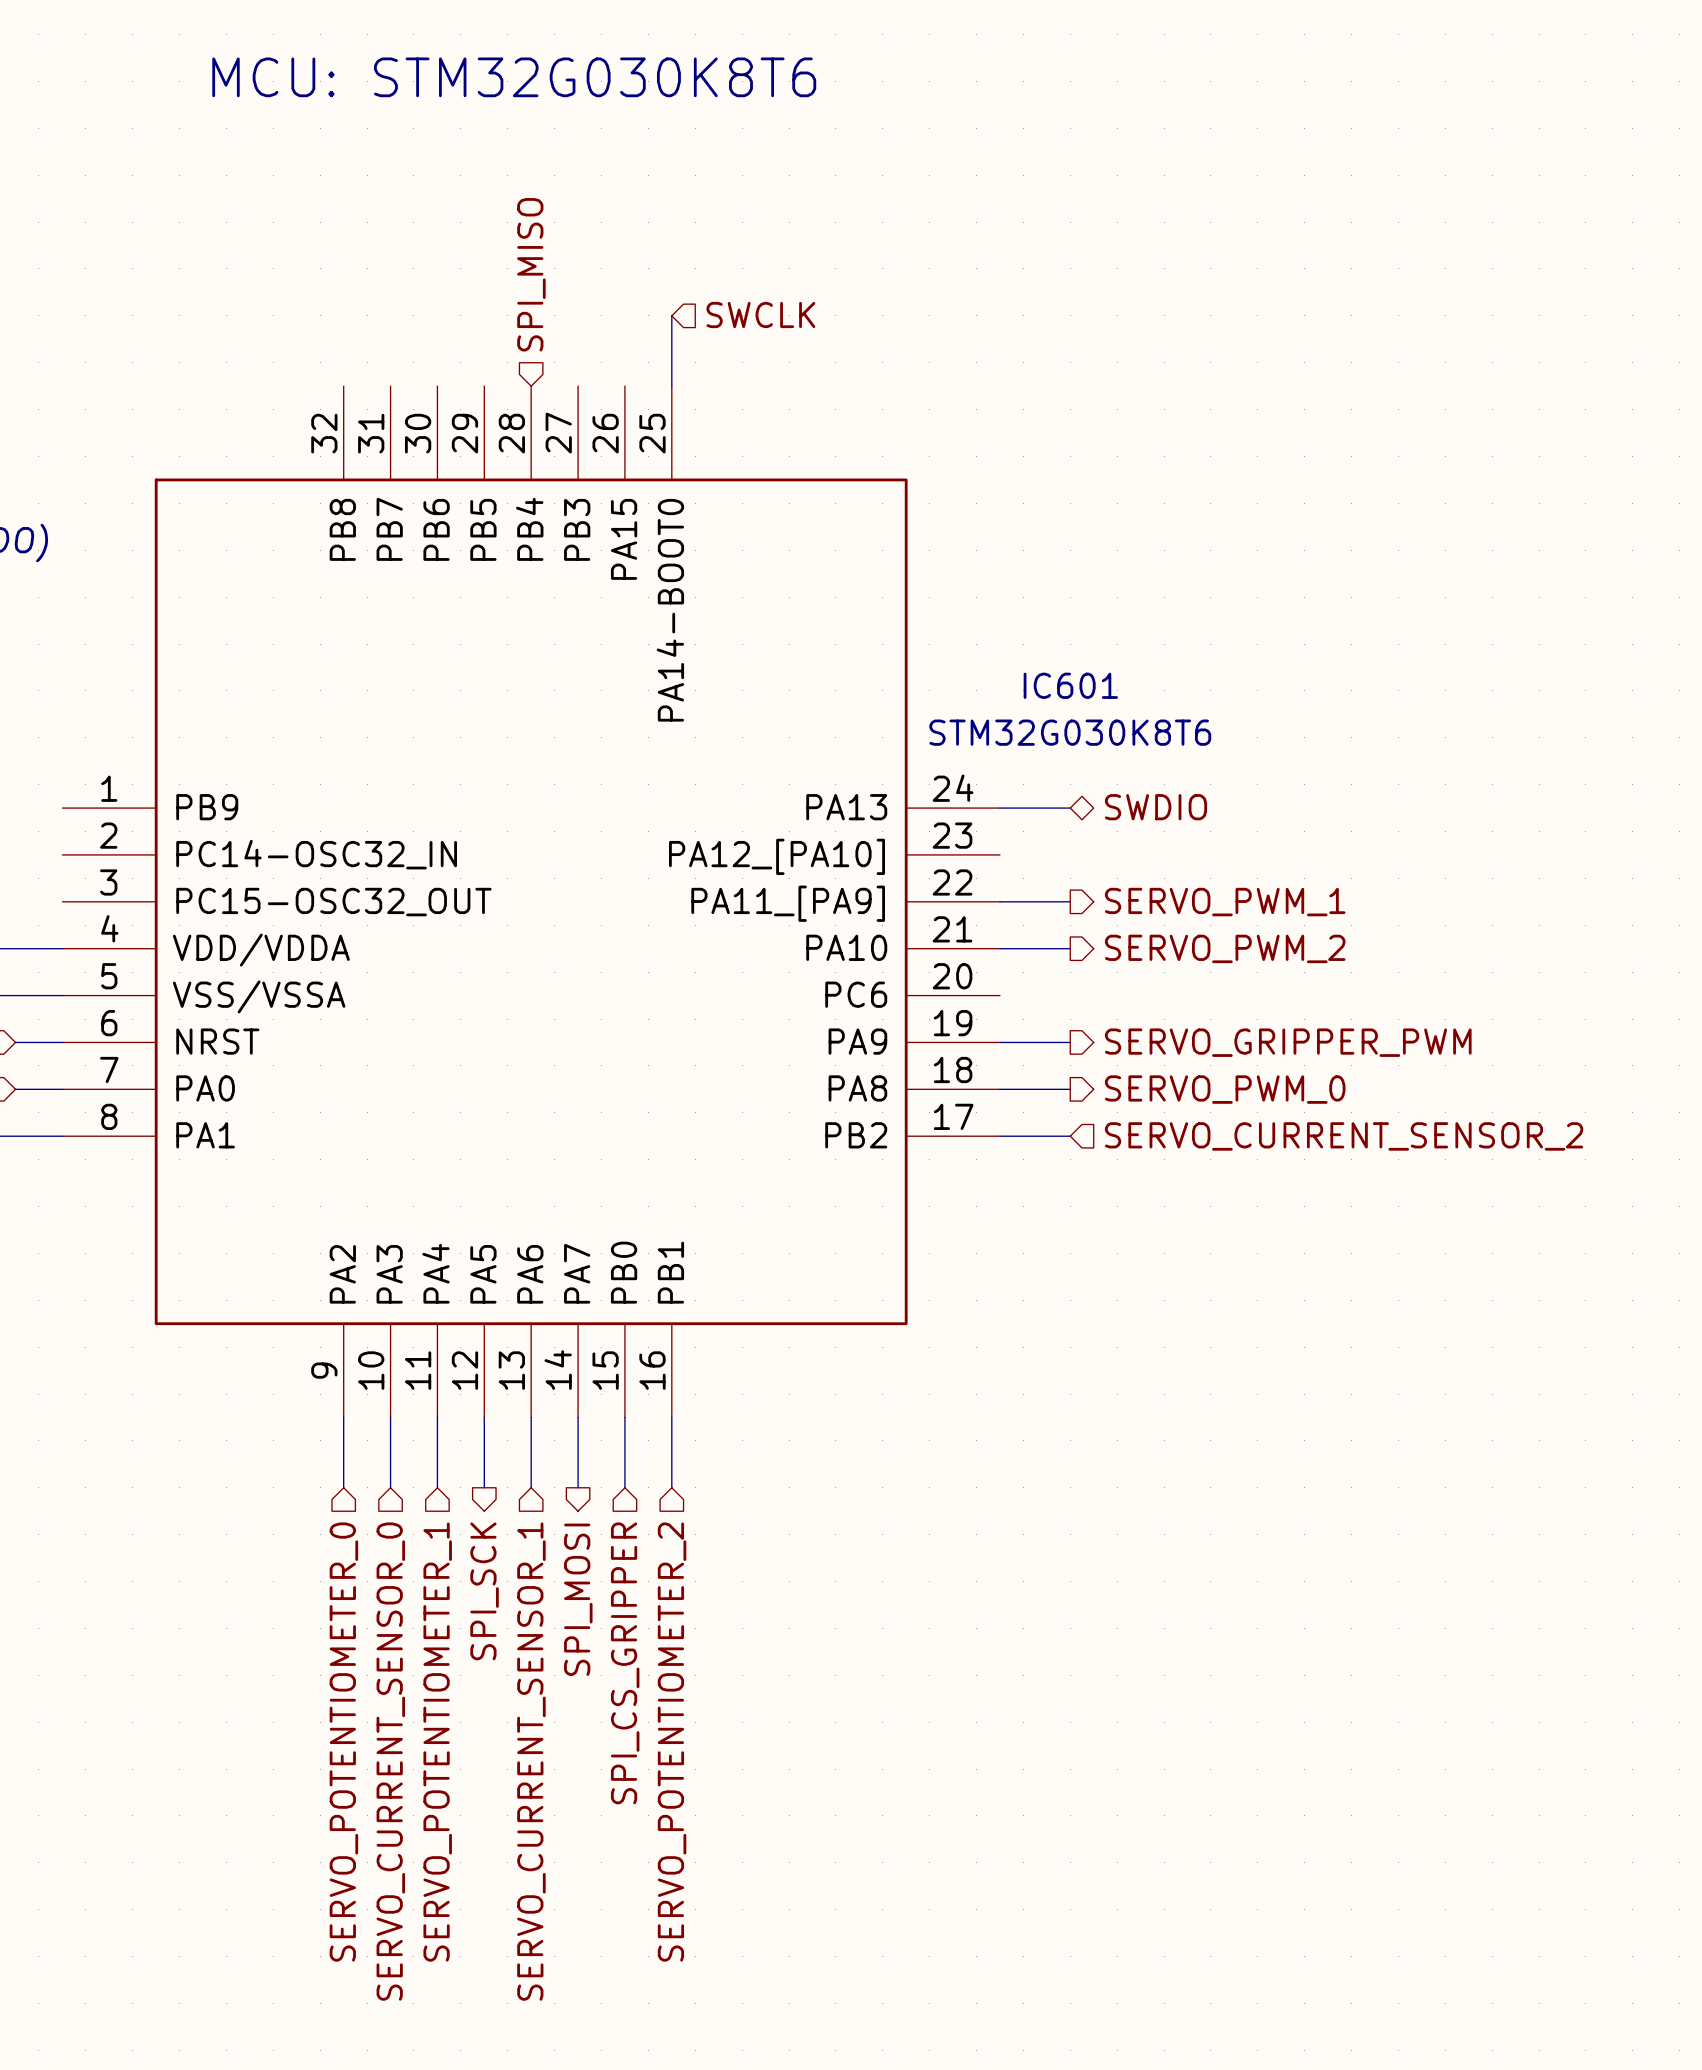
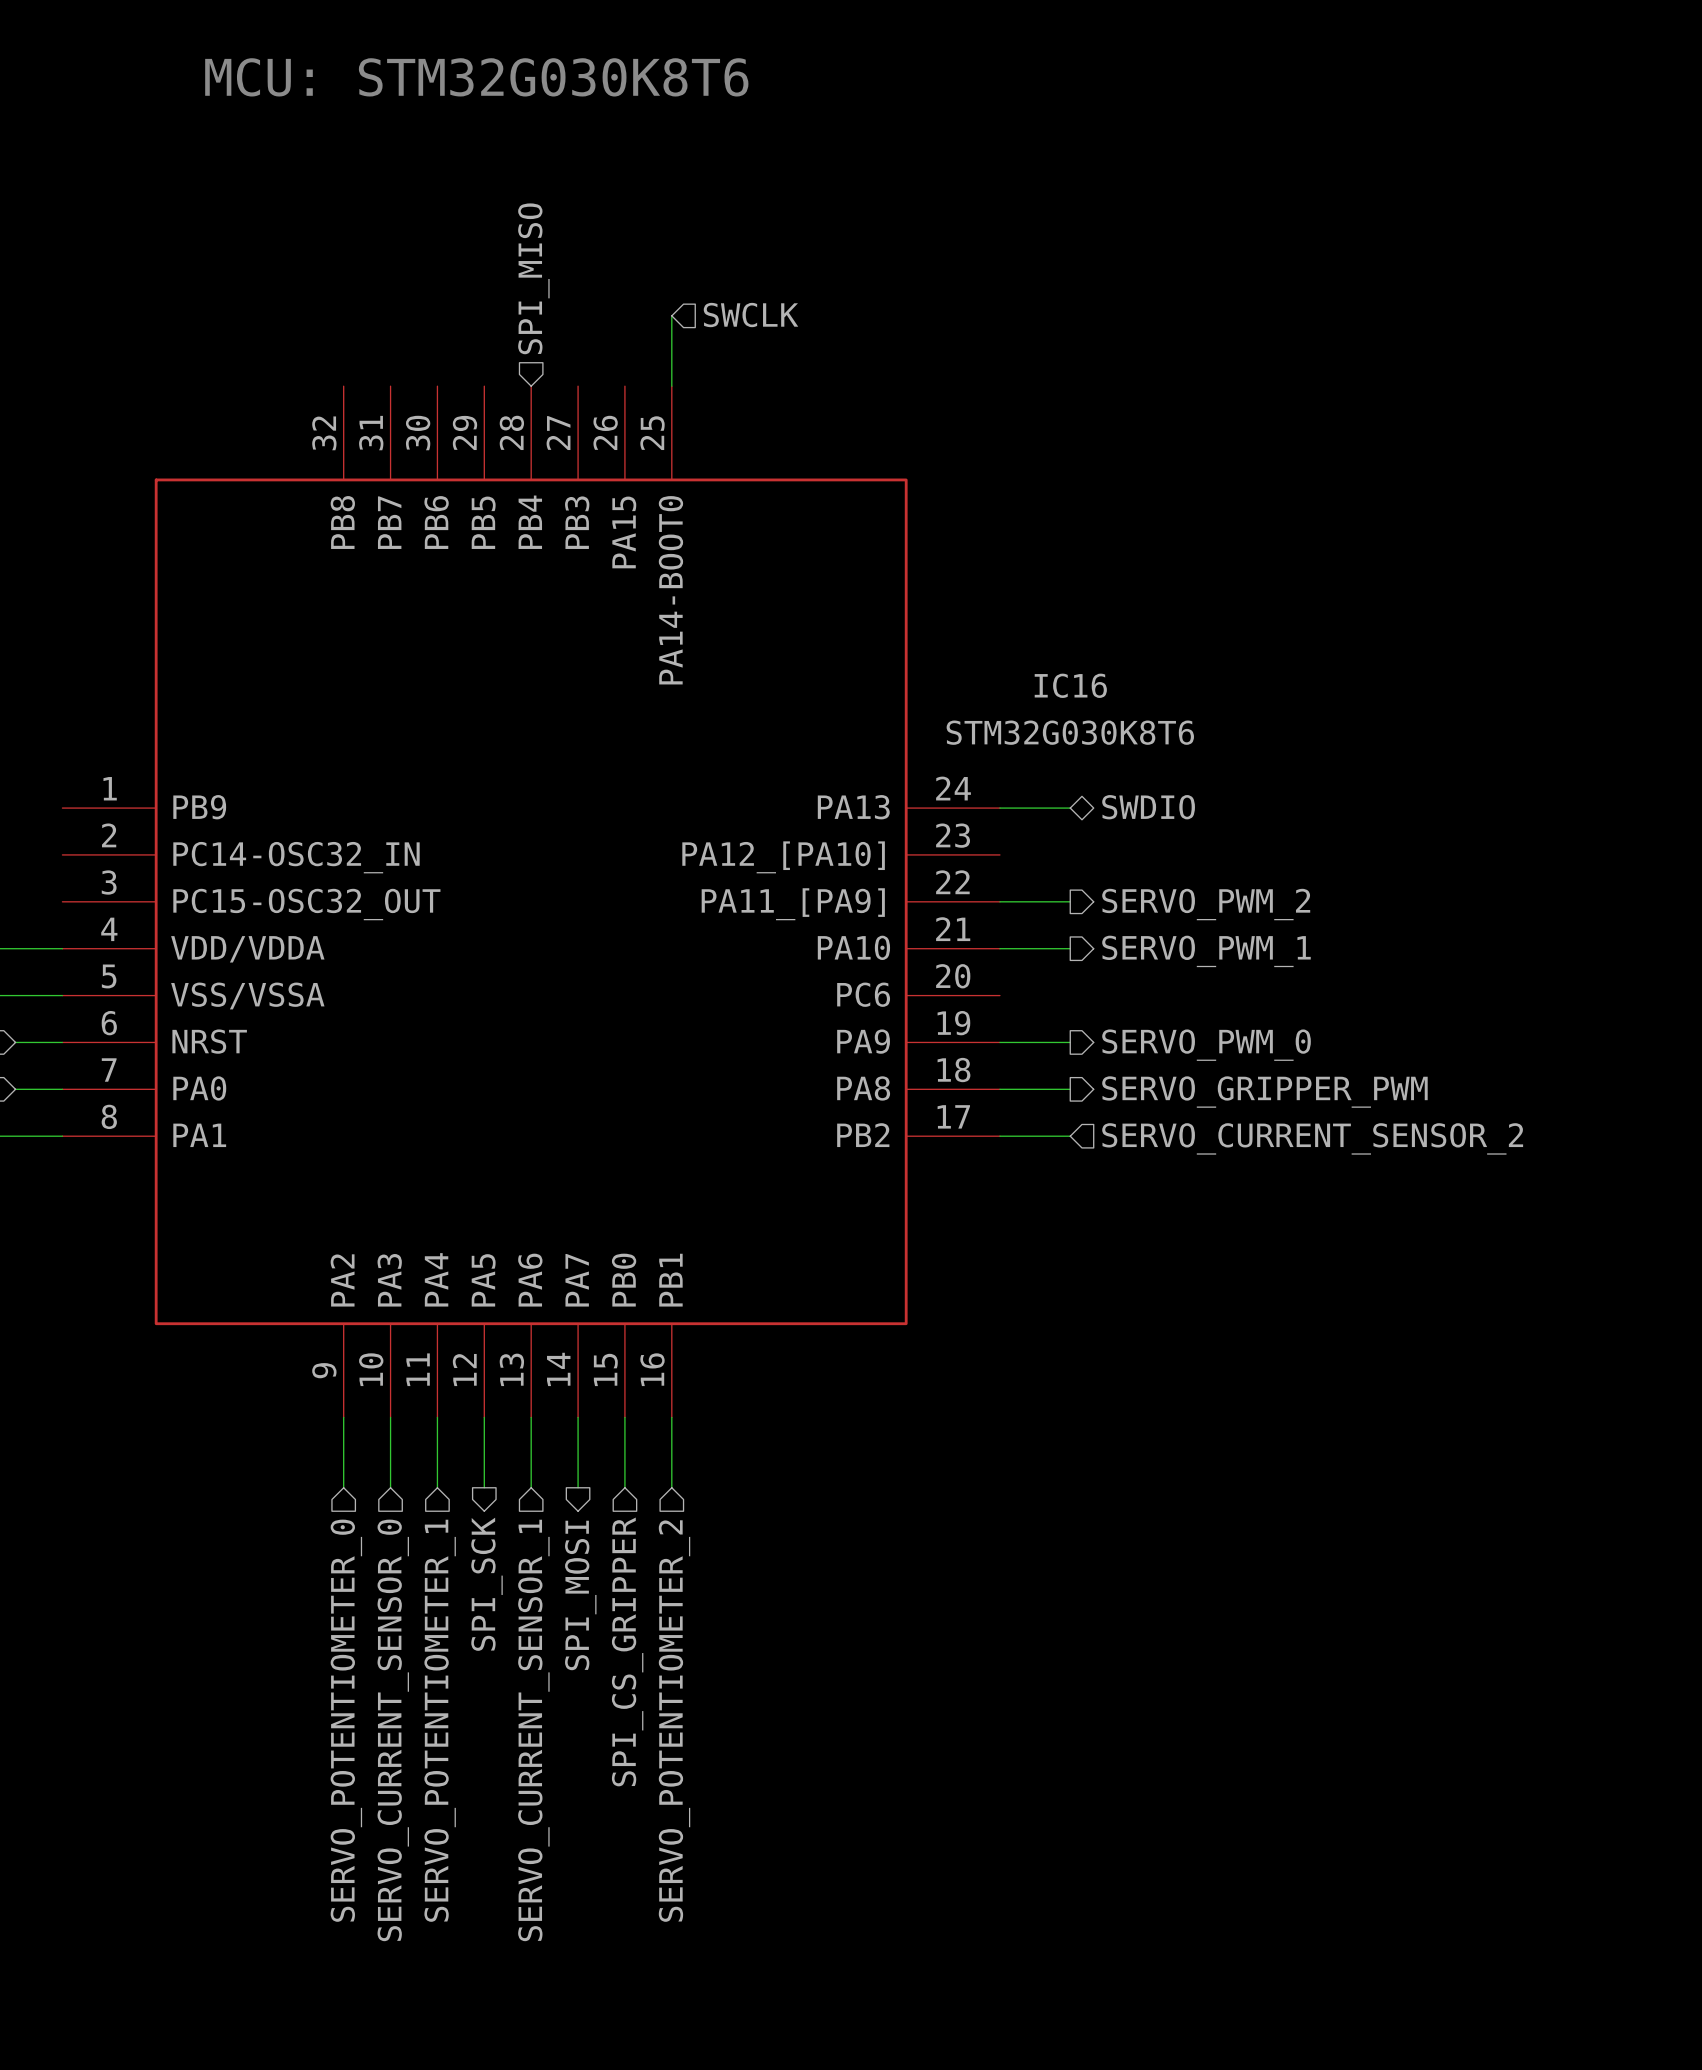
IC601 name: IC601 (1070, 685) -> IC16 (1070, 685)
hierarchical label: SERVO_PWM_1 (1225, 902) -> SERVO_PWM_2 (1206, 904)
hierarchical label: SERVO_PWM_2 (1225, 948) -> SERVO_PWM_1 (1206, 951)
hierarchical label: SERVO_GRIPPER_PWM (1288, 1042) -> SERVO_PWM_0 (1206, 1045)
hierarchical label: SERVO_PWM_0 (1225, 1089) -> SERVO_GRIPPER_PWM (1264, 1092)

